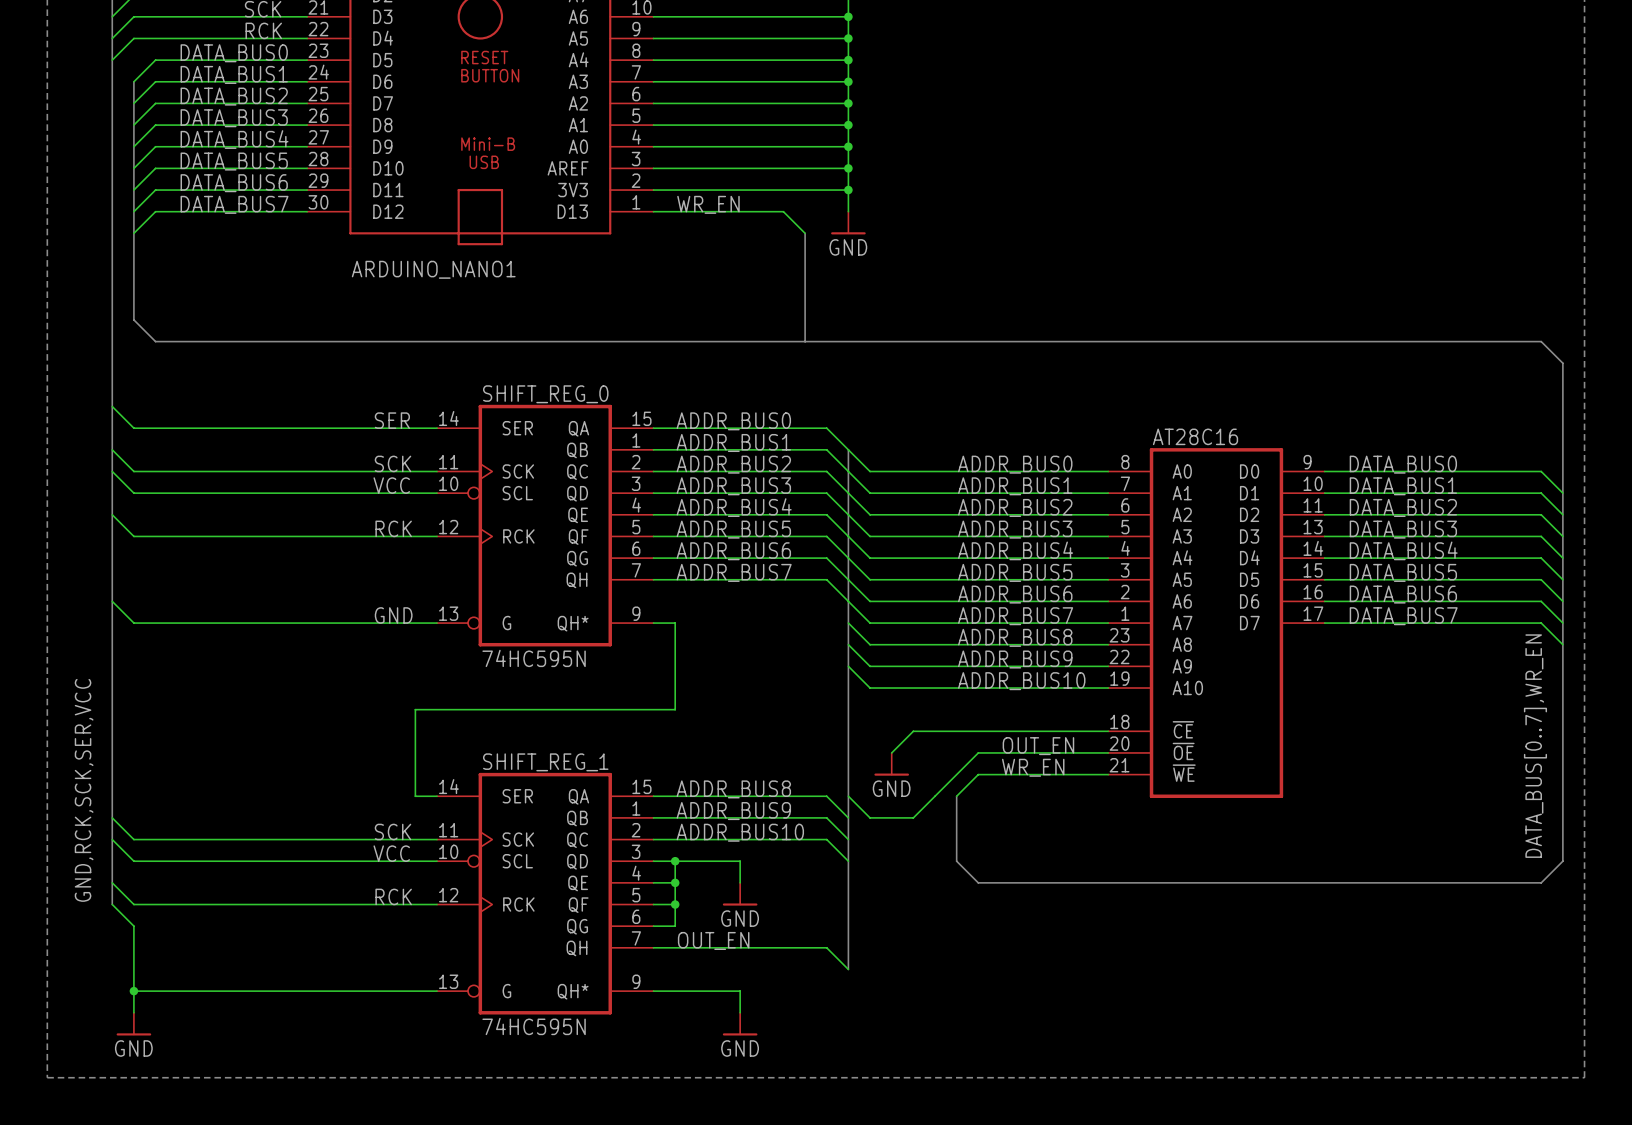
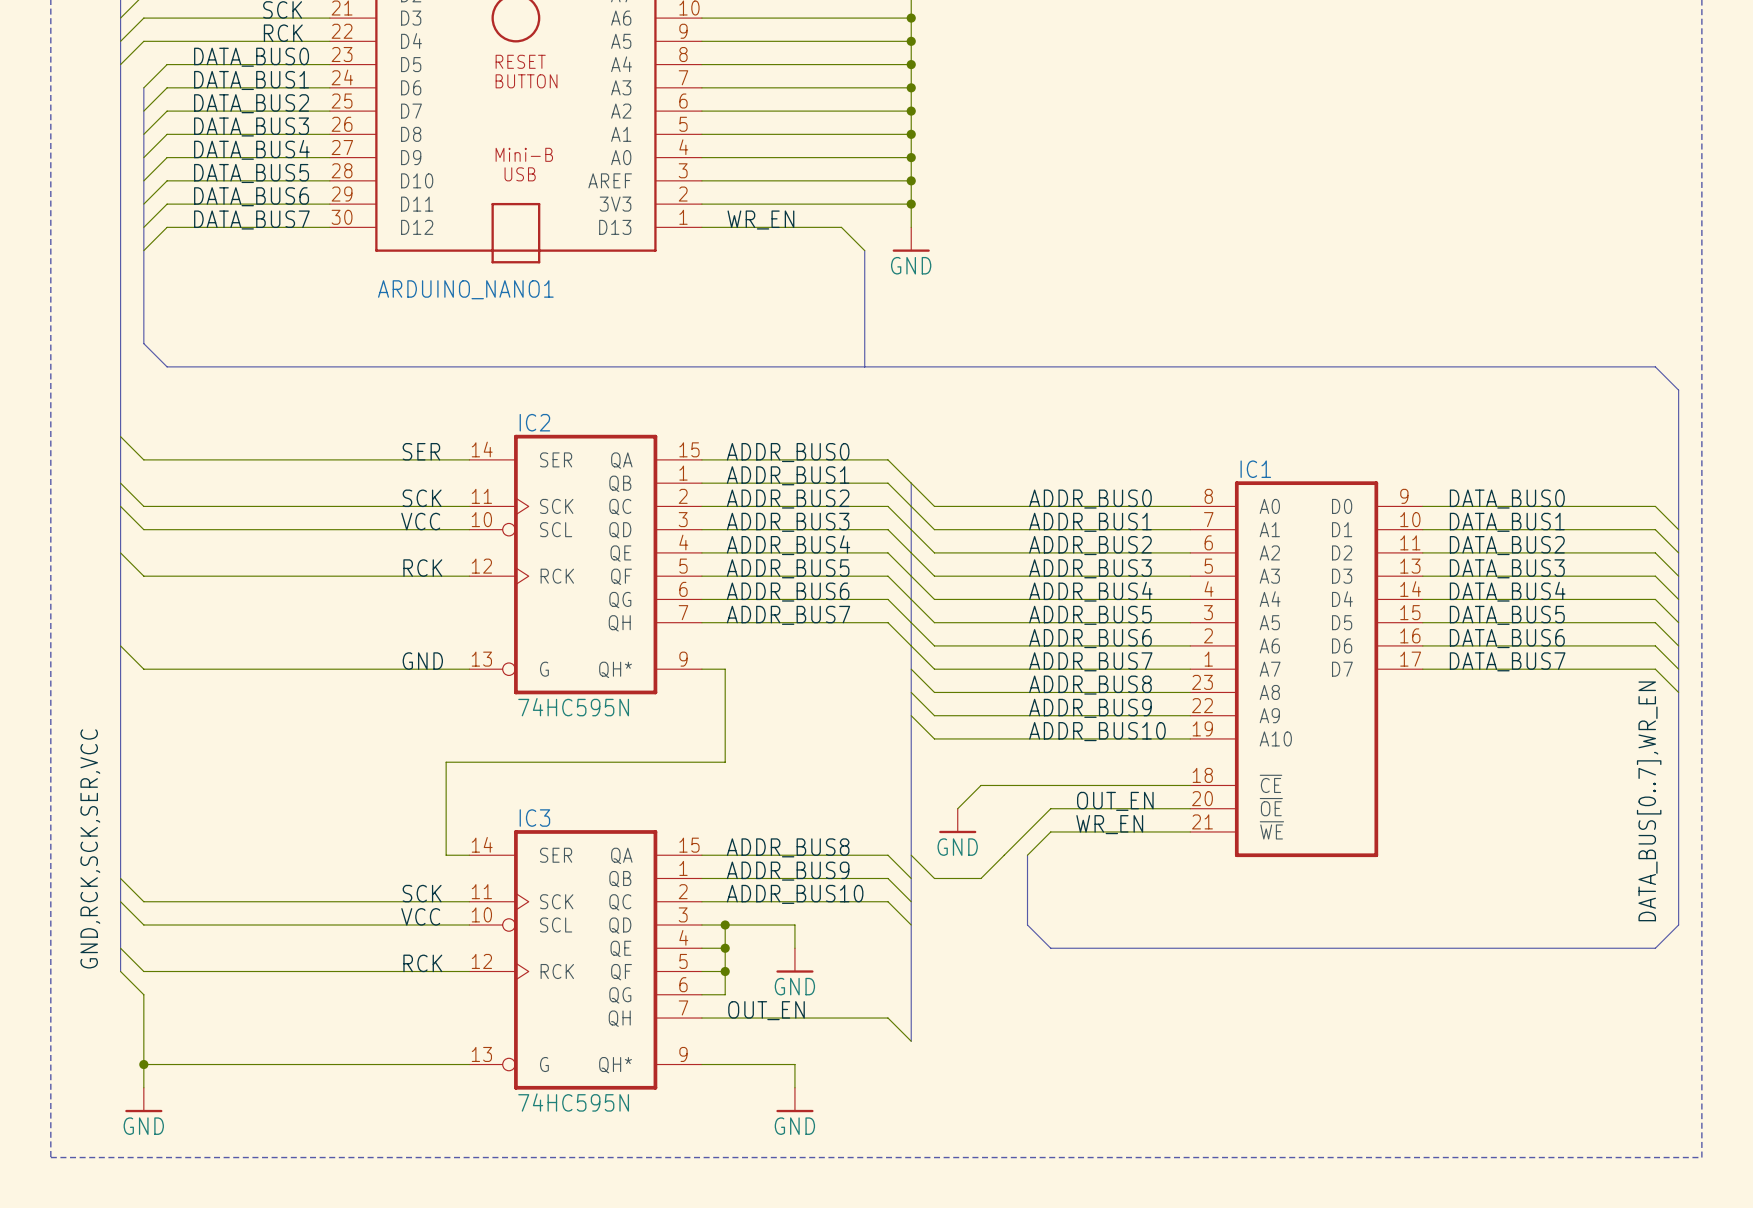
SHIFT_REG_0 name: SHIFT_REG_0 (545, 394) -> IC2 (534, 422)
AT28C16 name: AT28C16 (1195, 436) -> IC1 (1255, 469)
SHIFT_REG_1 name: SHIFT_REG_1 (545, 762) -> IC3 (534, 818)

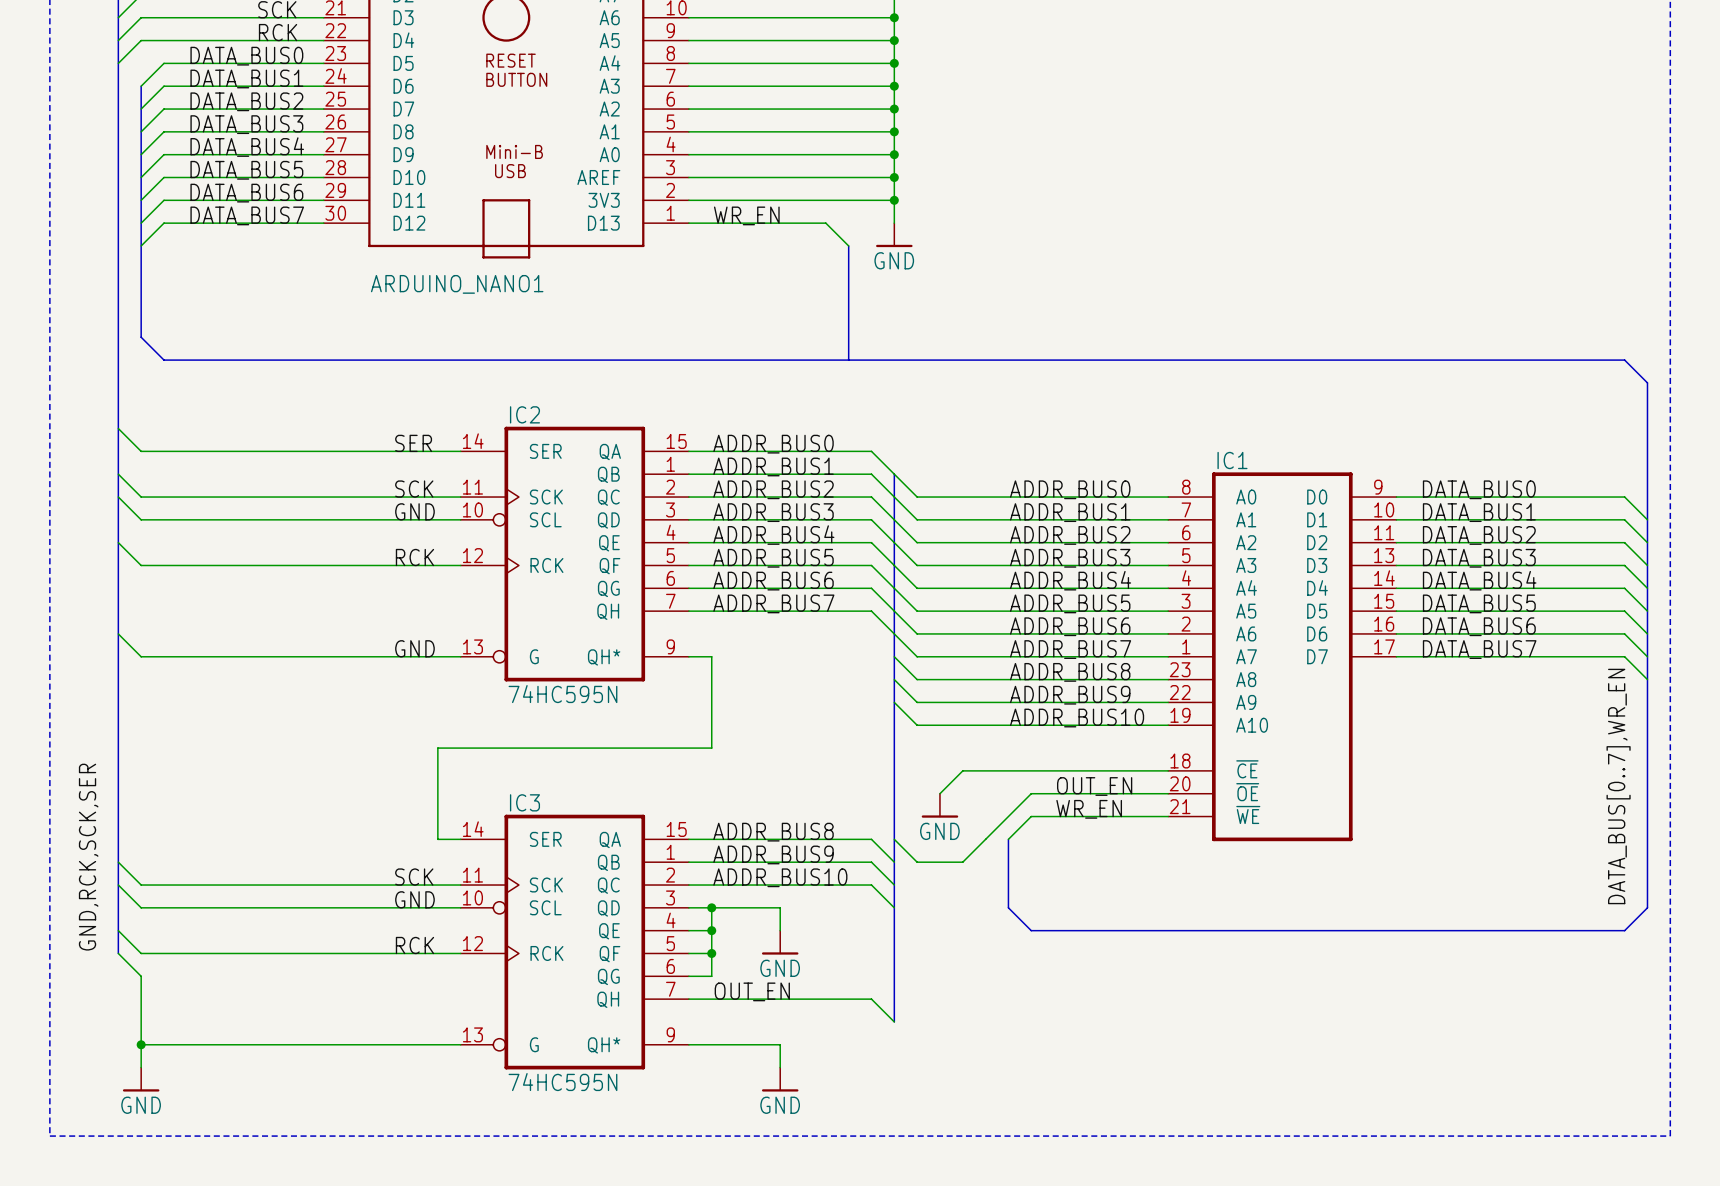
label: VCC (420, 521) -> GND (414, 511)
label: GND,RCK,SCK,SER,VCC (90, 848) -> GND,RCK,SCK,SER (88, 857)
label: VCC (420, 916) -> GND (414, 899)

